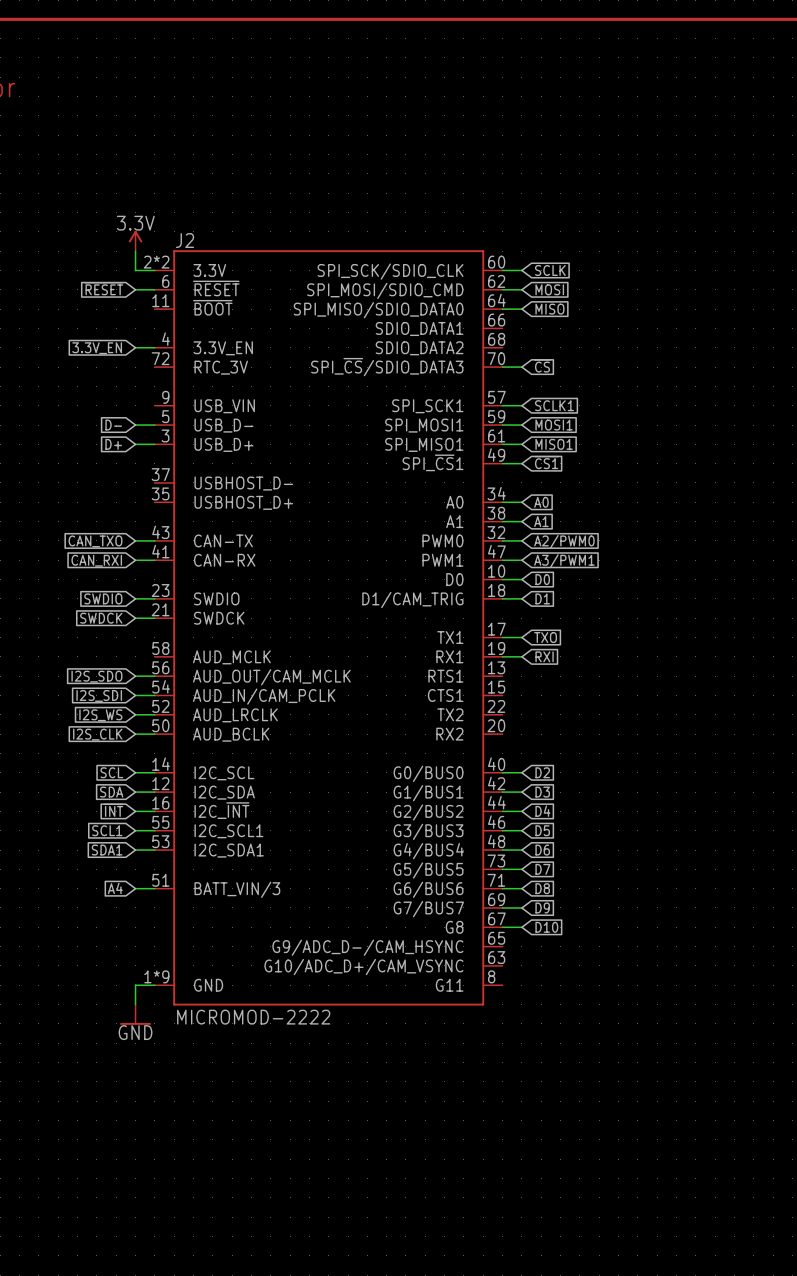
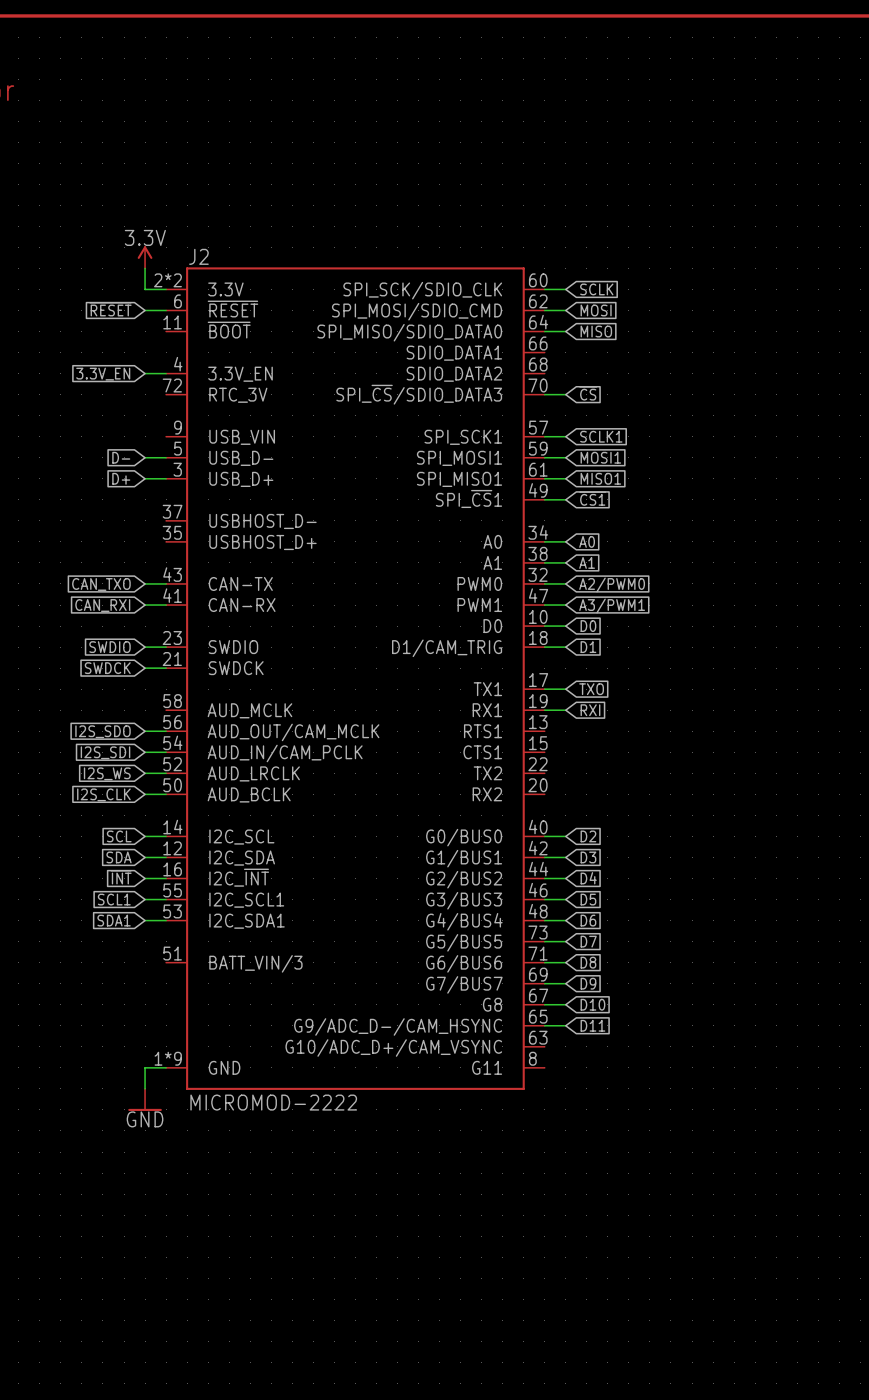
global label: A4 (115, 888) -> none
wire: (135, 888) (154, 888) -> none
wire: none -> (544, 1025) (565, 1025)
global label: none -> D11 (592, 1025)

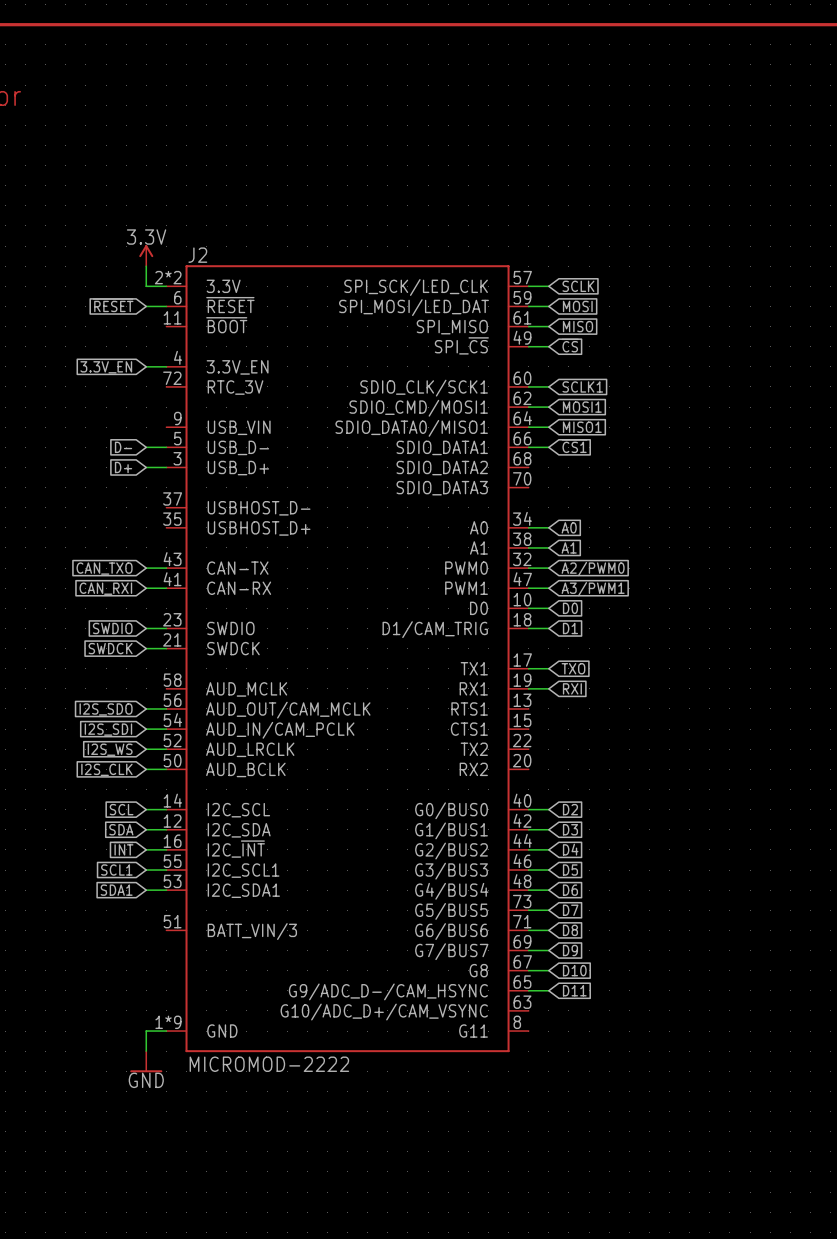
J2 symbol: [166, 267, 545, 1090] -> [166, 265, 529, 1053]
global label: none -> ~{CS} (570, 345)
global label: ~{CS} (588, 393) -> SCLK1 (582, 386)
global label: none -> MOSI1 (582, 407)
global label: SCLK1 (601, 436) -> MISO1 (582, 427)
global label: MOSI1 (600, 457) -> ~{CS1} (574, 446)
wire: (544, 478) (565, 478) -> (528, 407) (548, 407)
global label: MISO1 (600, 478) -> none
global label: ~{CS1} (592, 498) -> none
wire: (544, 499) (565, 499) -> (528, 346) (548, 346)

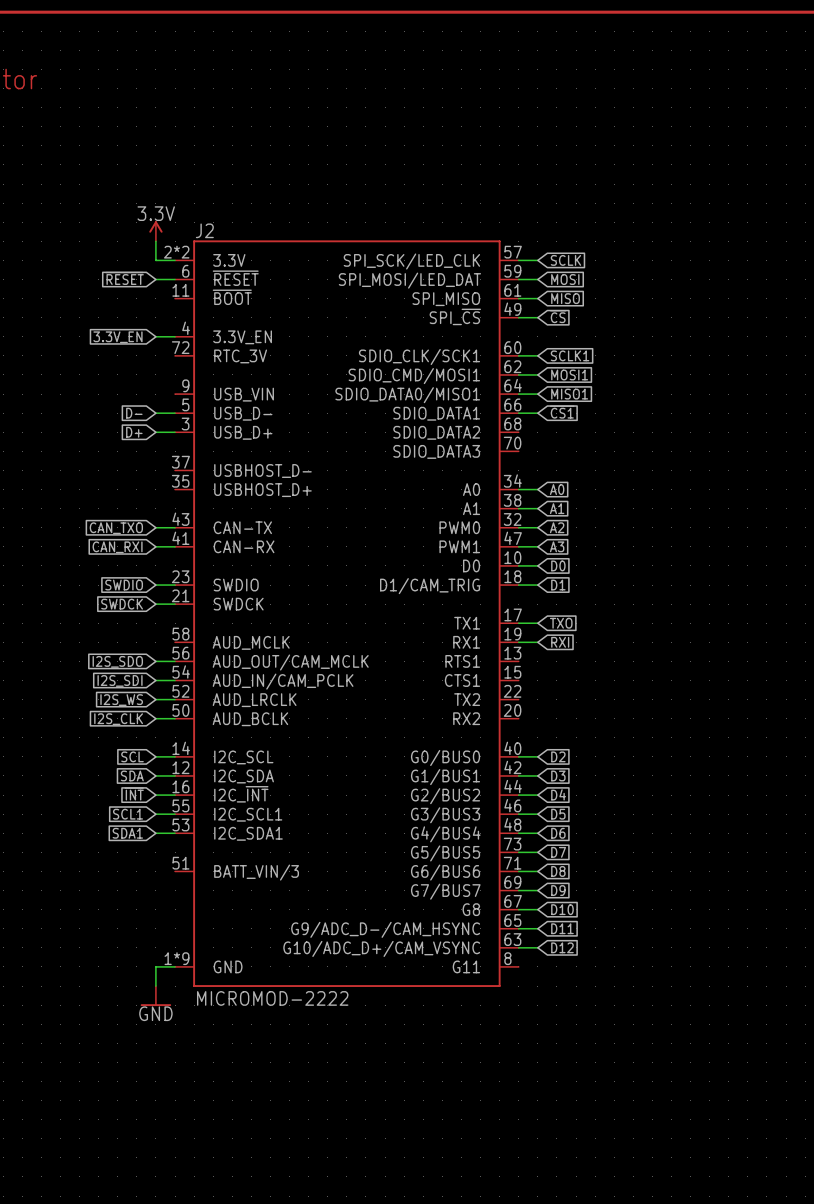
global label: A2/PWM0 (593, 569) -> A2 (557, 527)
global label: A3/PWM1 (593, 589) -> A3 (557, 546)
wire: none -> (518, 947) (537, 947)
global label: none -> D12 (562, 947)

